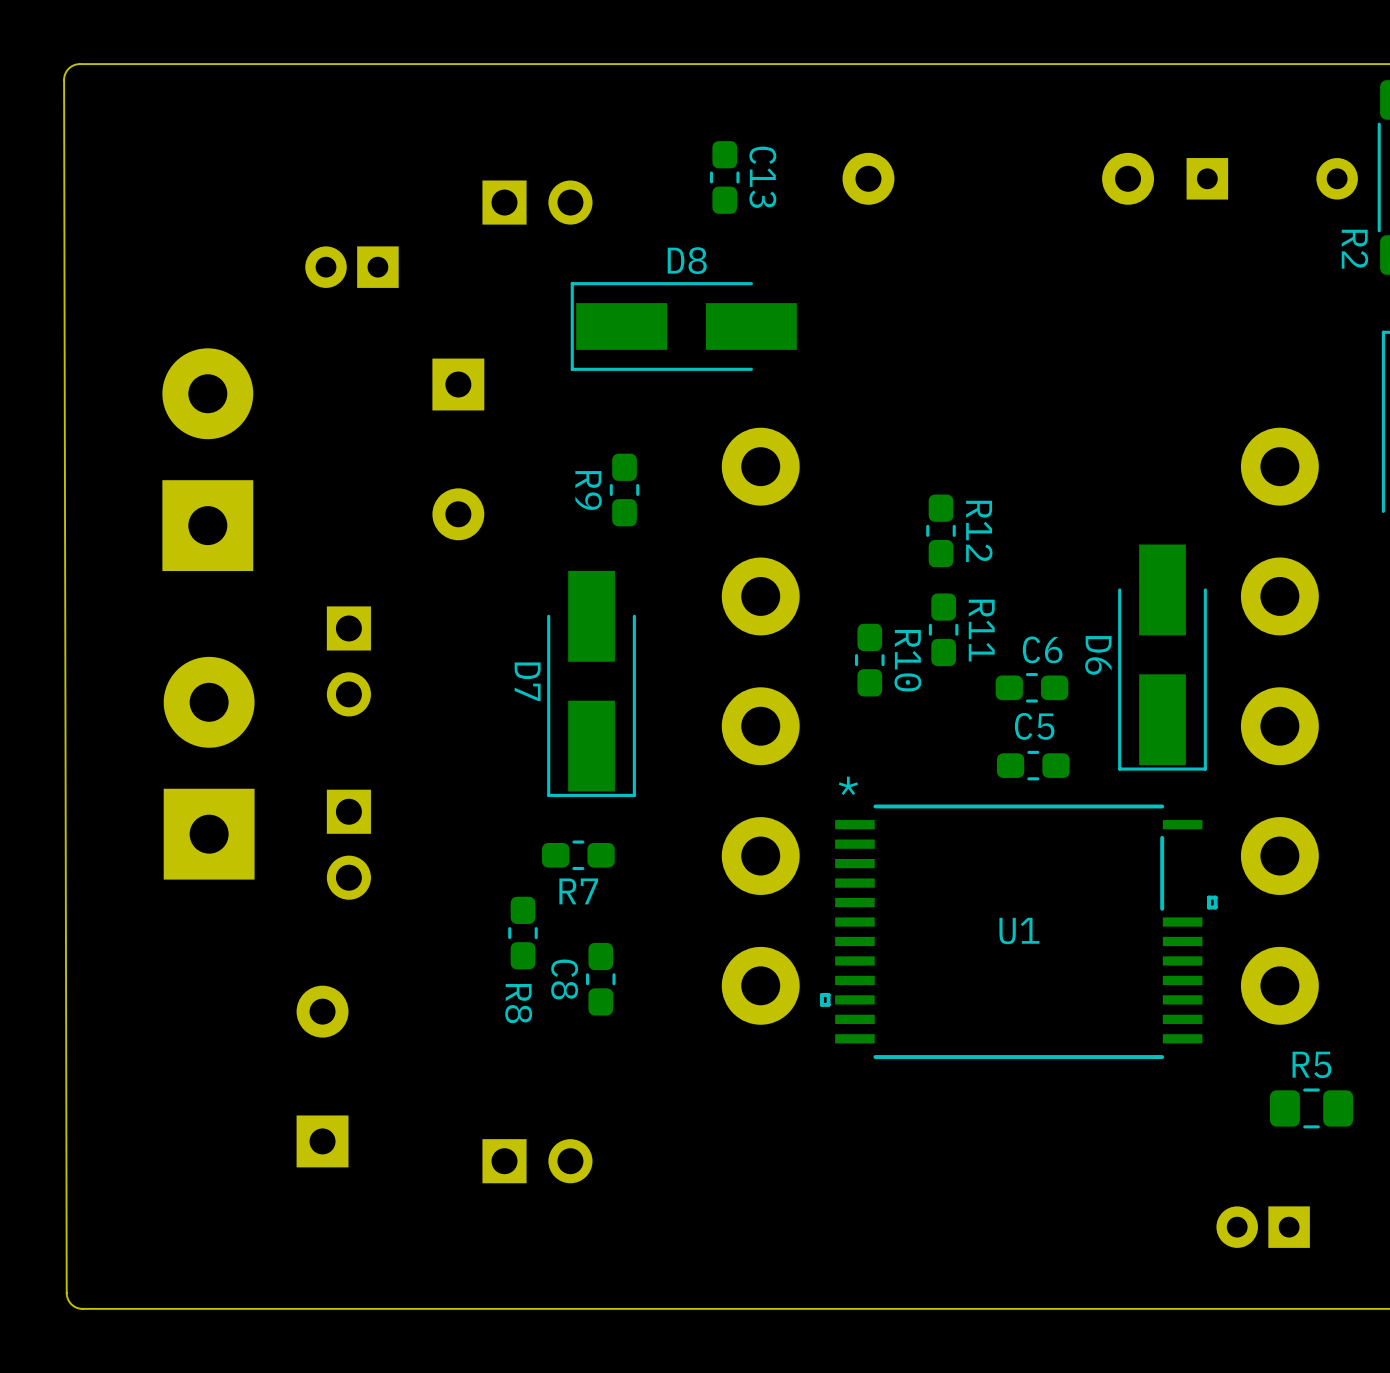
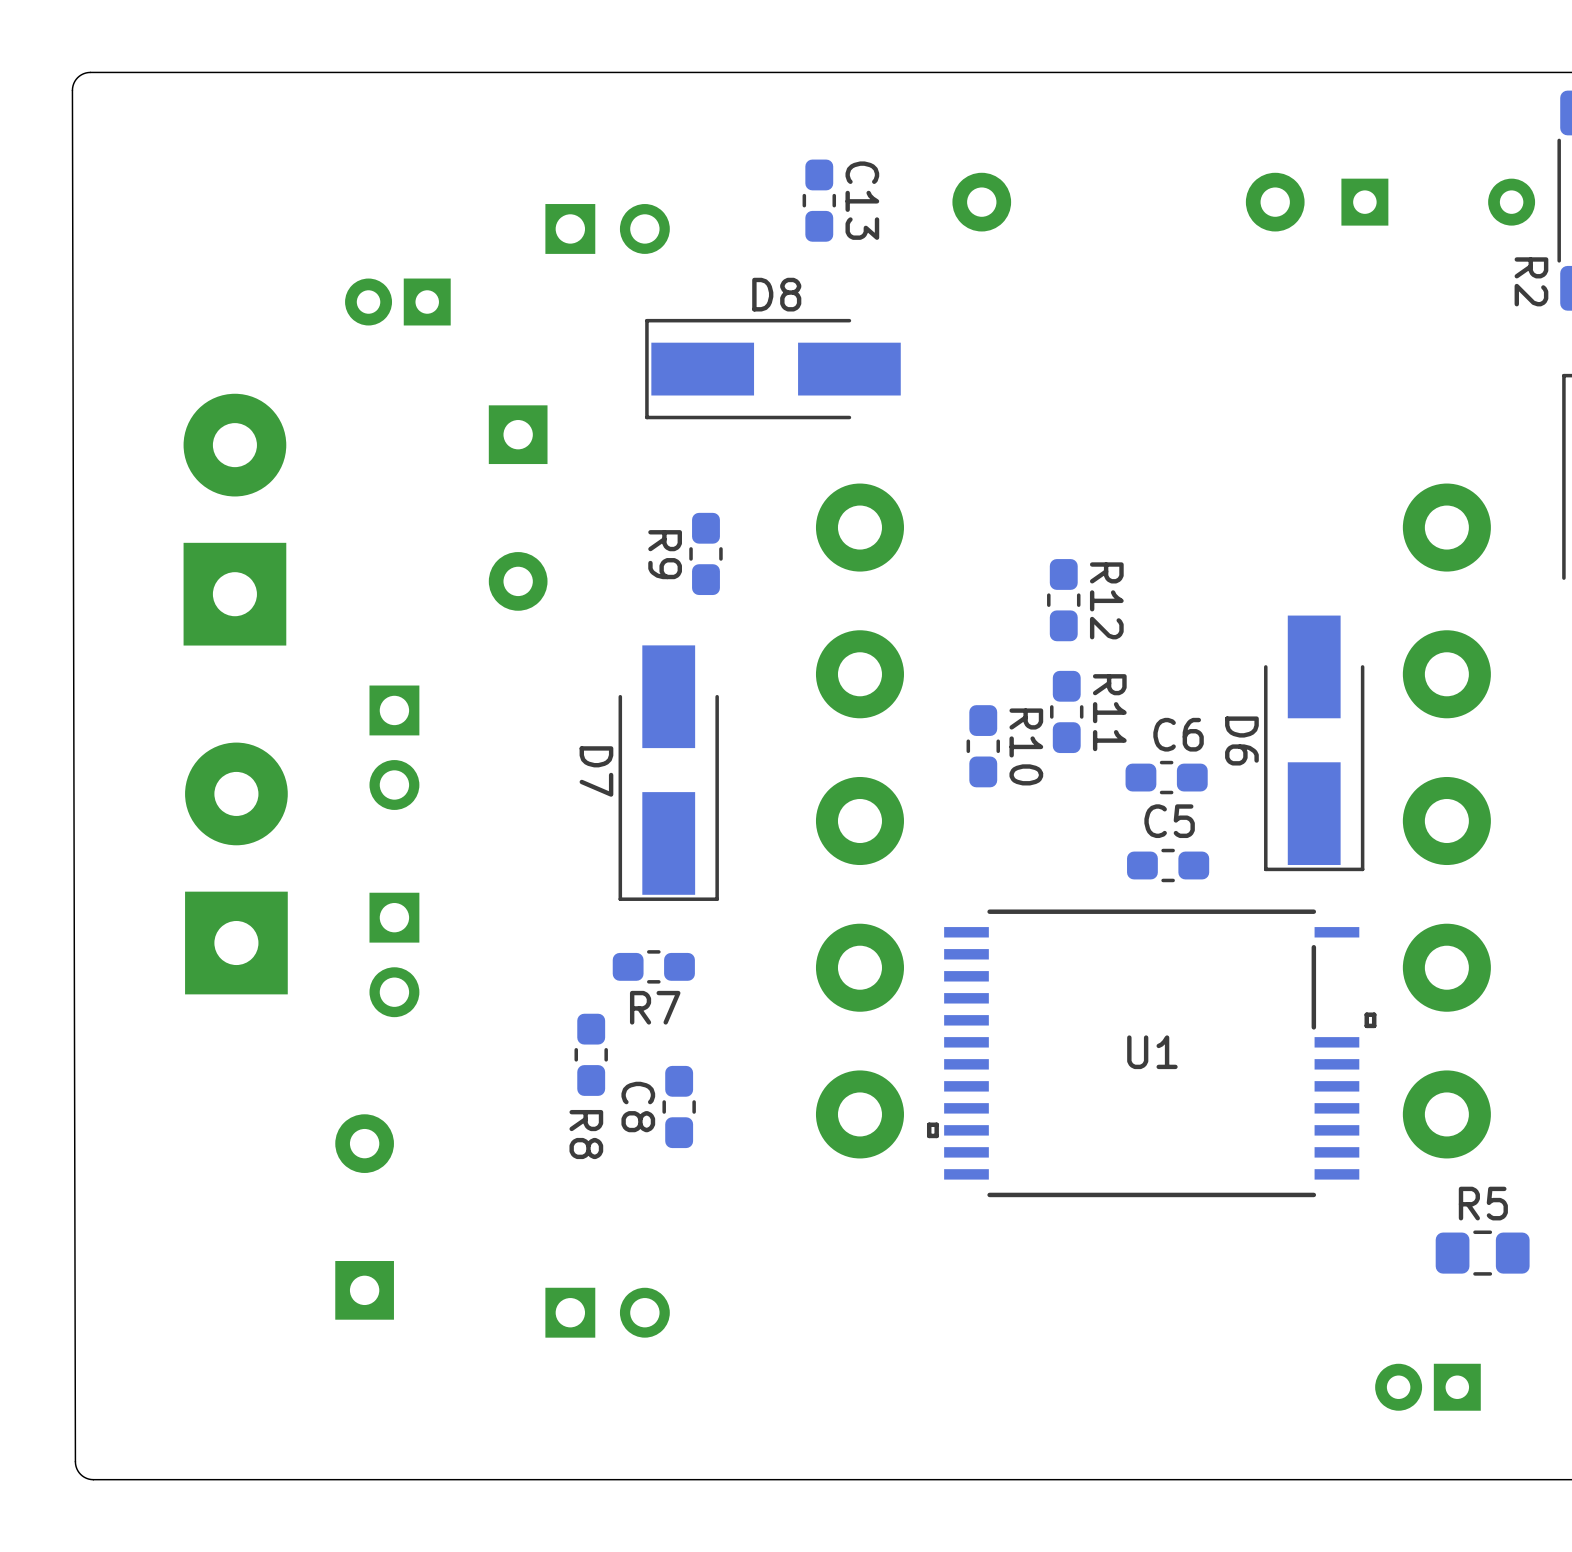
U1 text: * (848, 785) -> none

